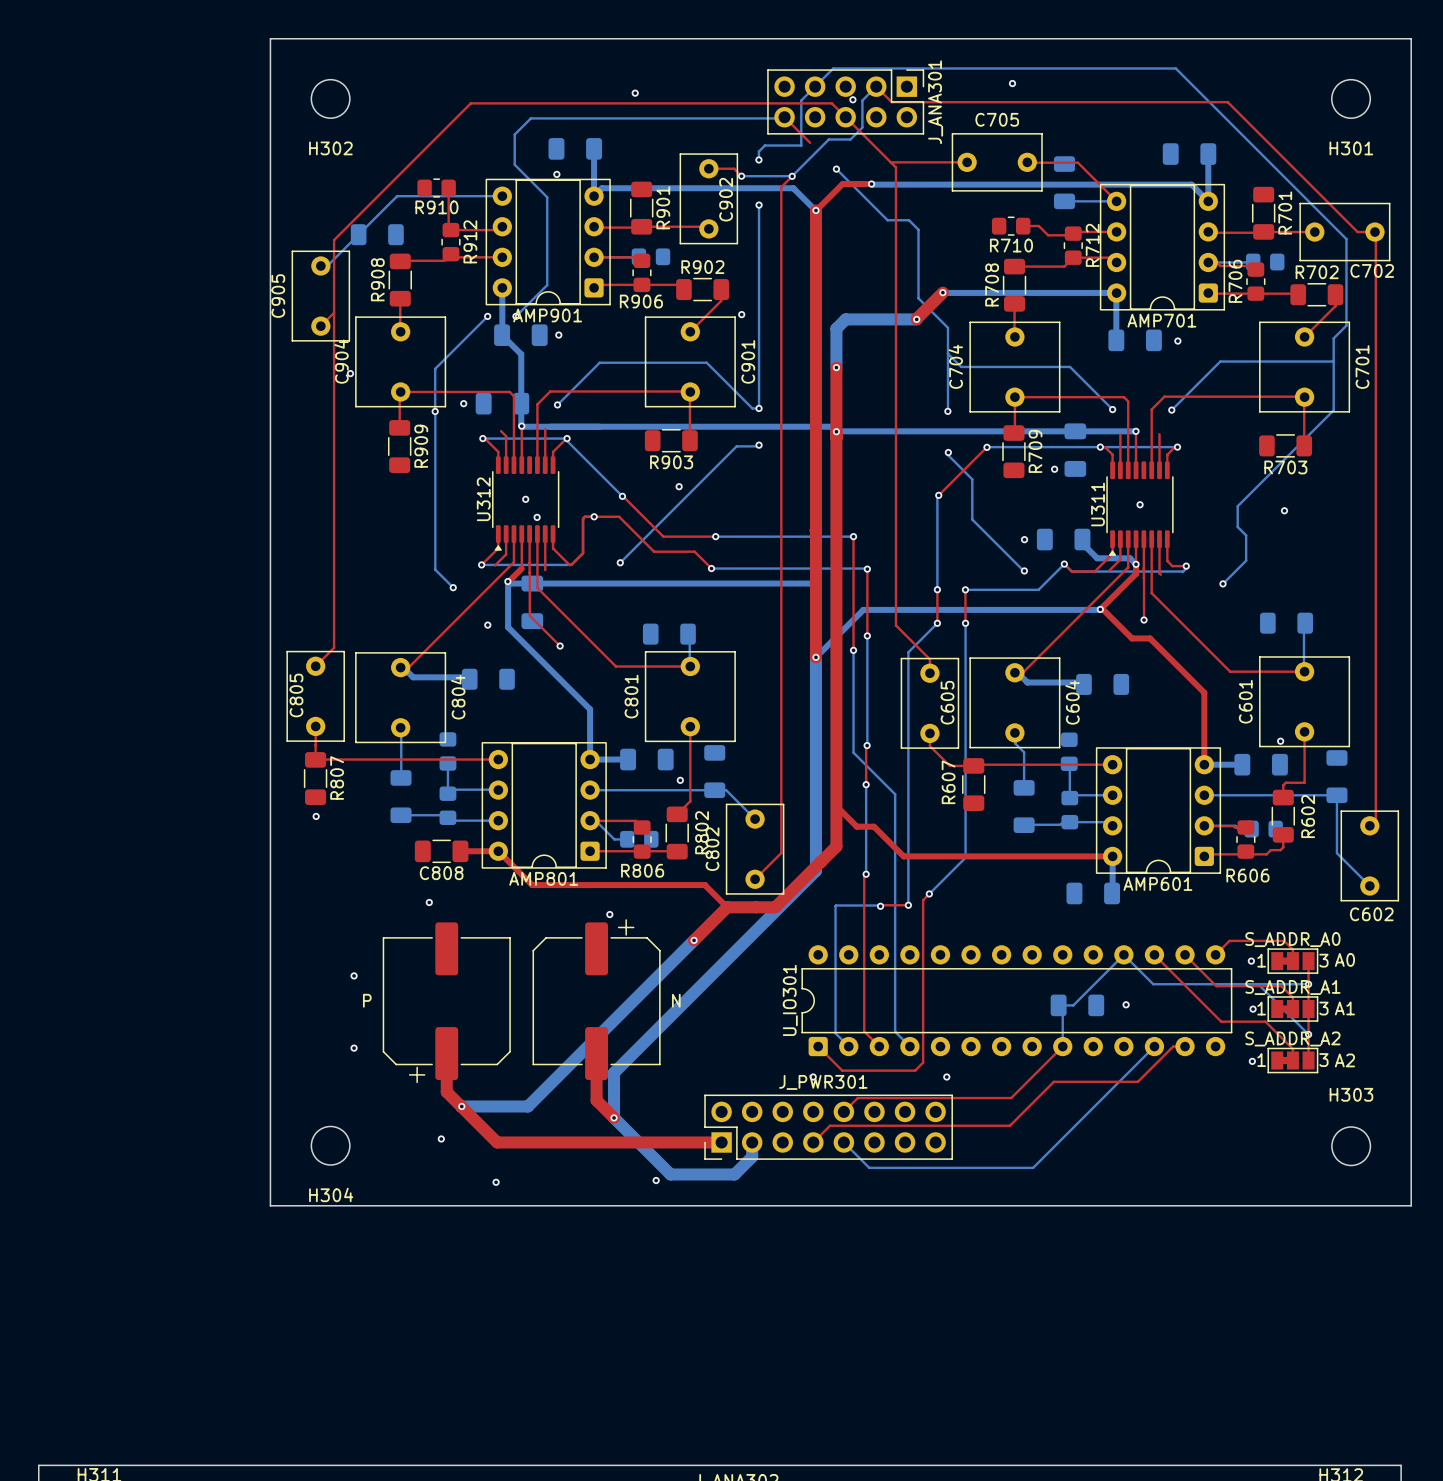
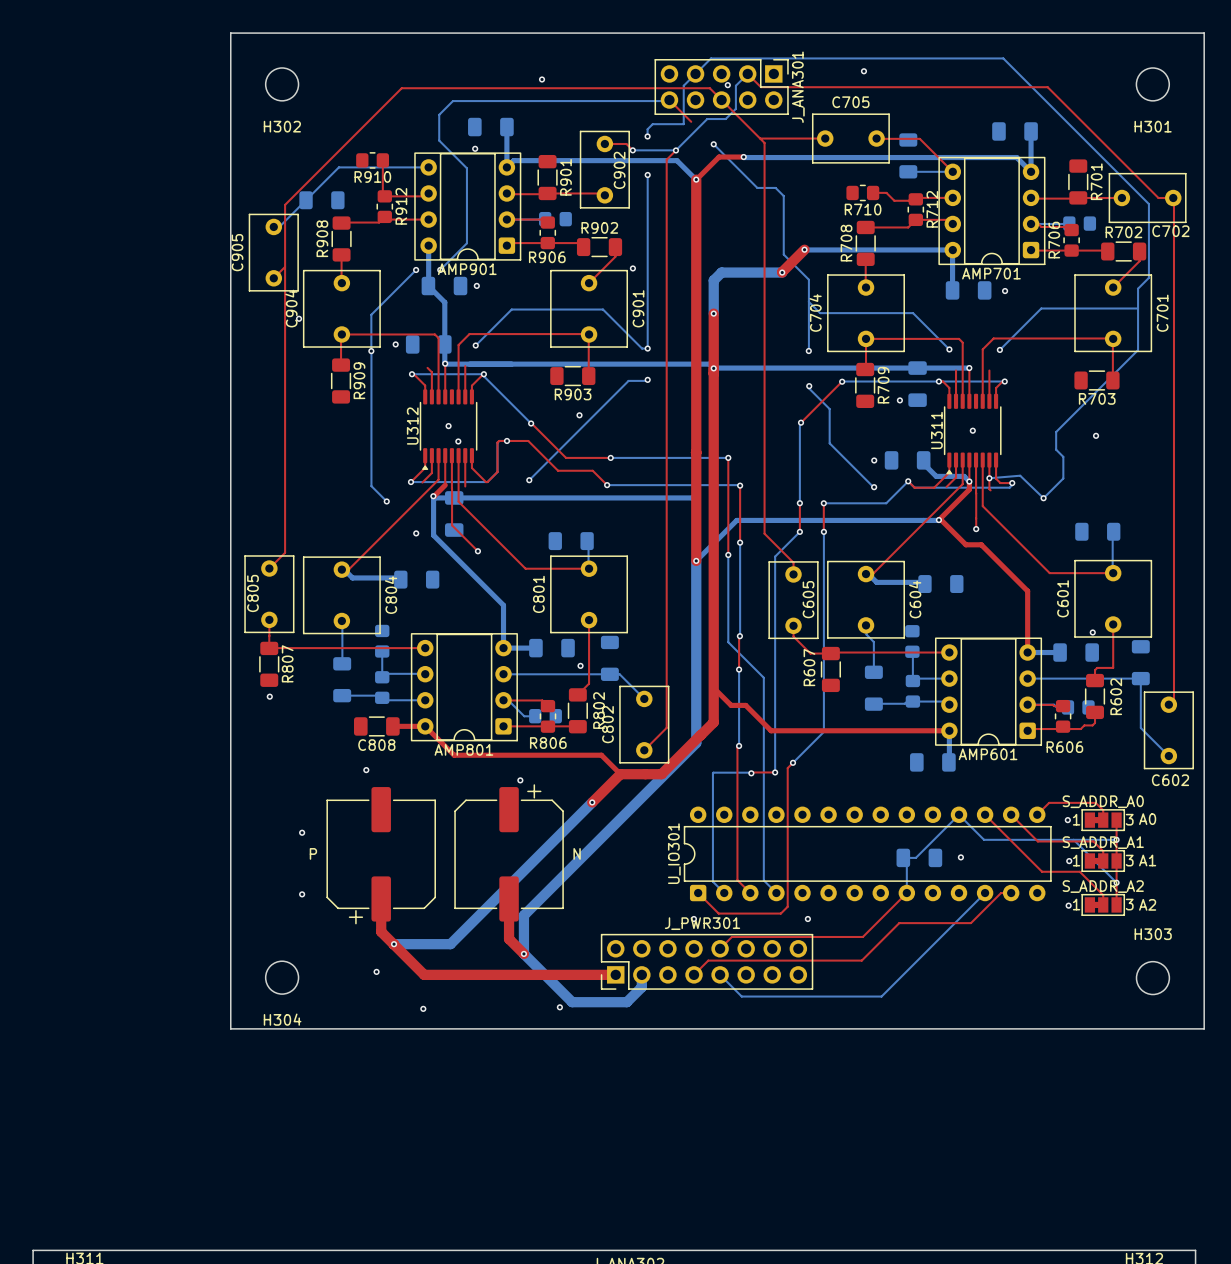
bottom track: none -> (989, 478) (1020, 475) (1043, 498)
via: none -> (989, 478)

